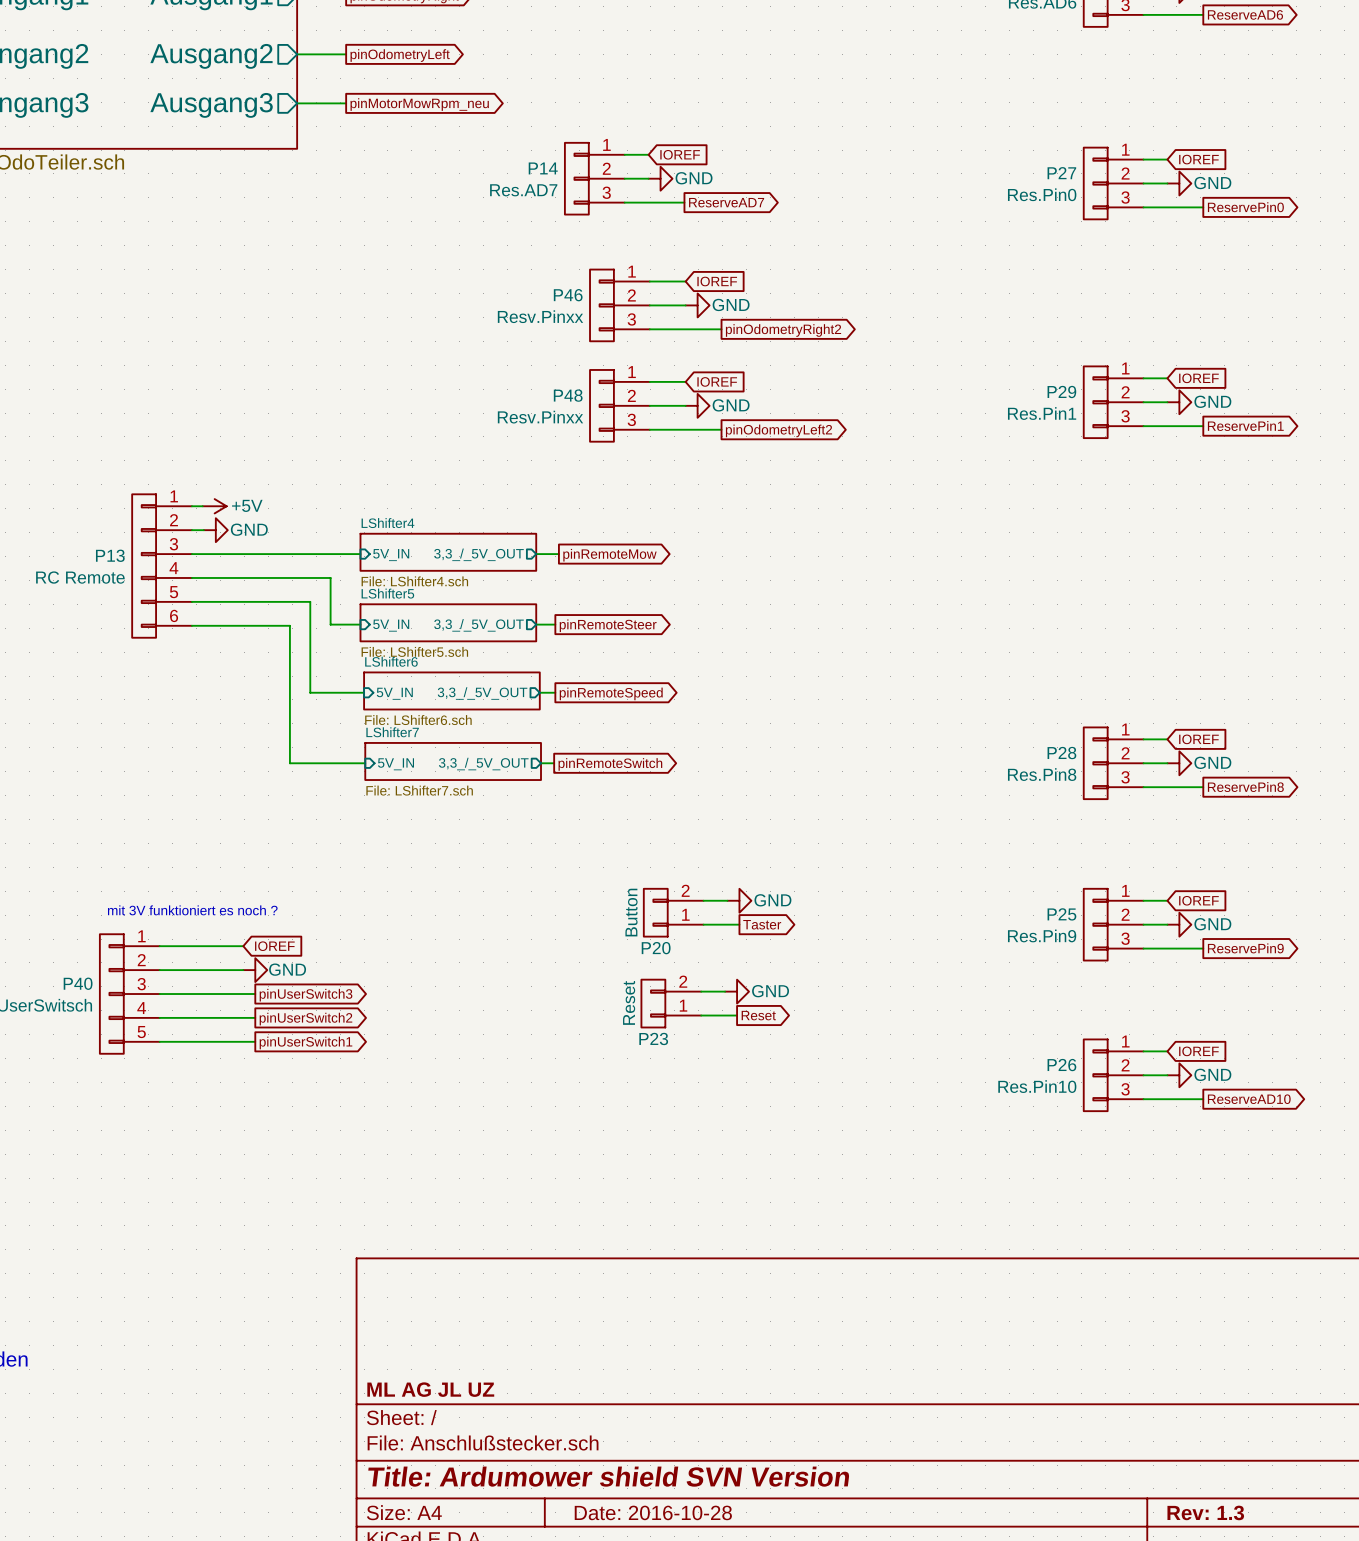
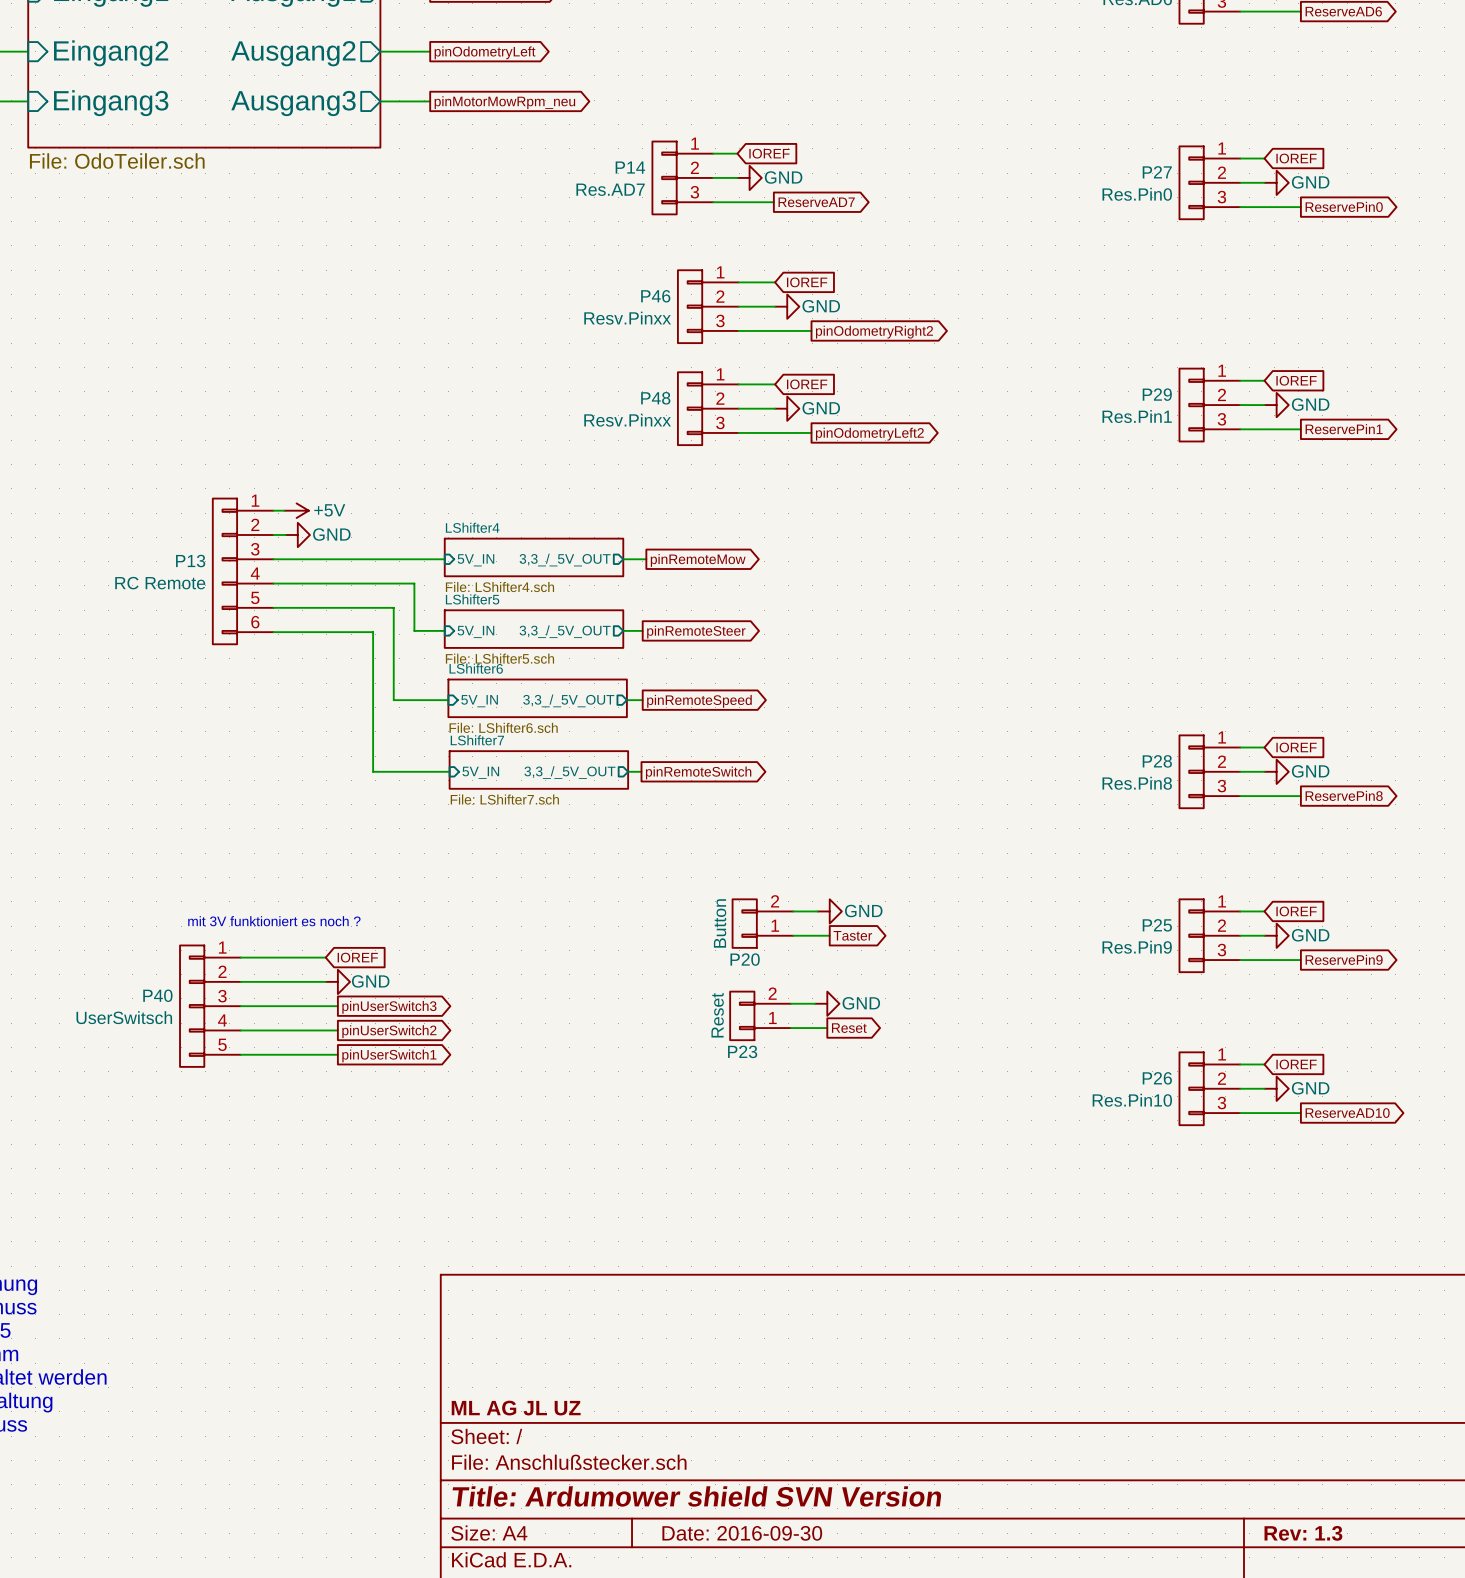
title block: Date: 2016-10-28 (653, 1512) -> Date: 2016-09-30 (742, 1533)

